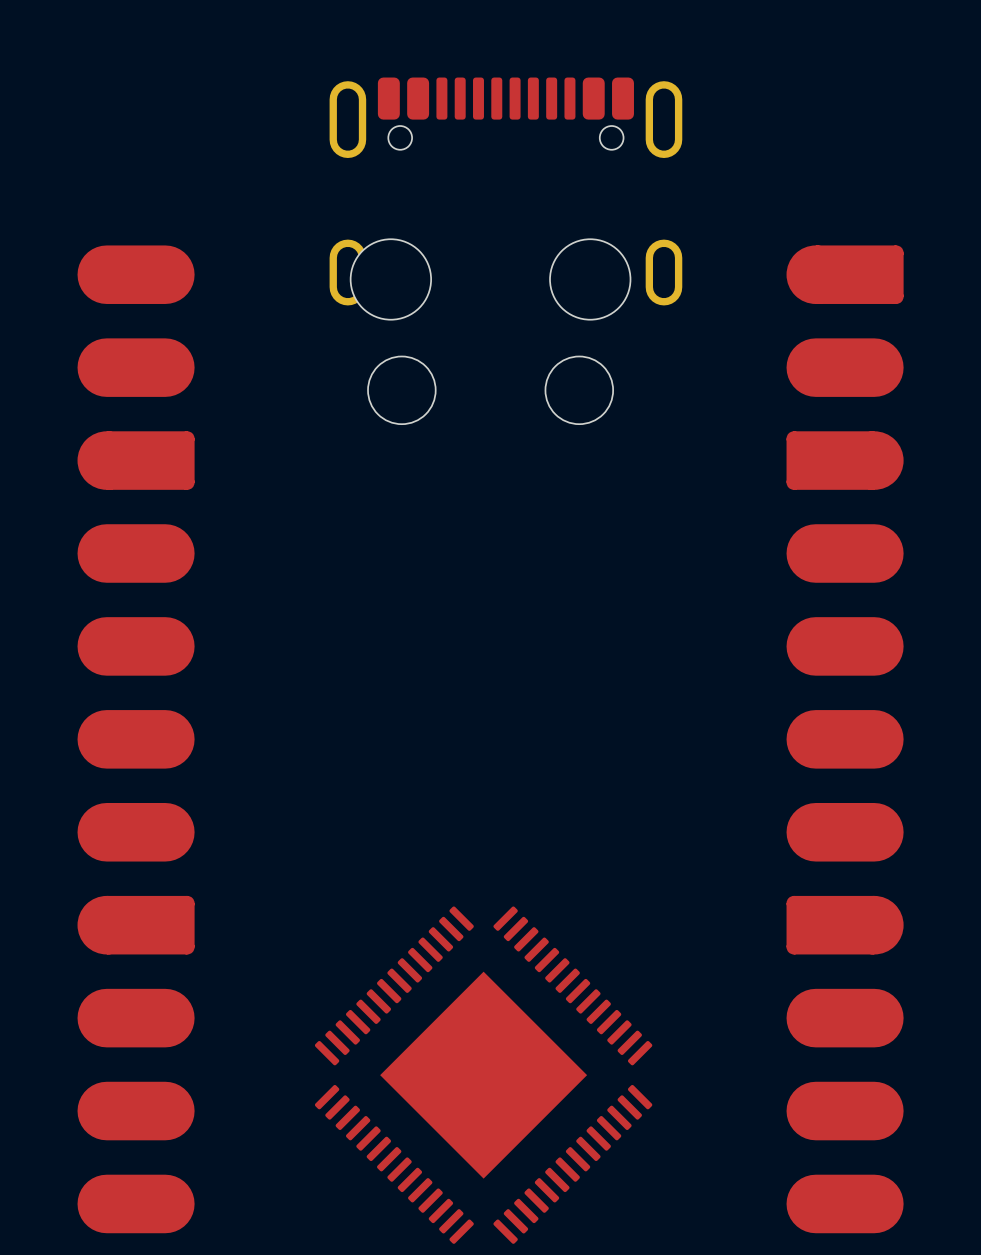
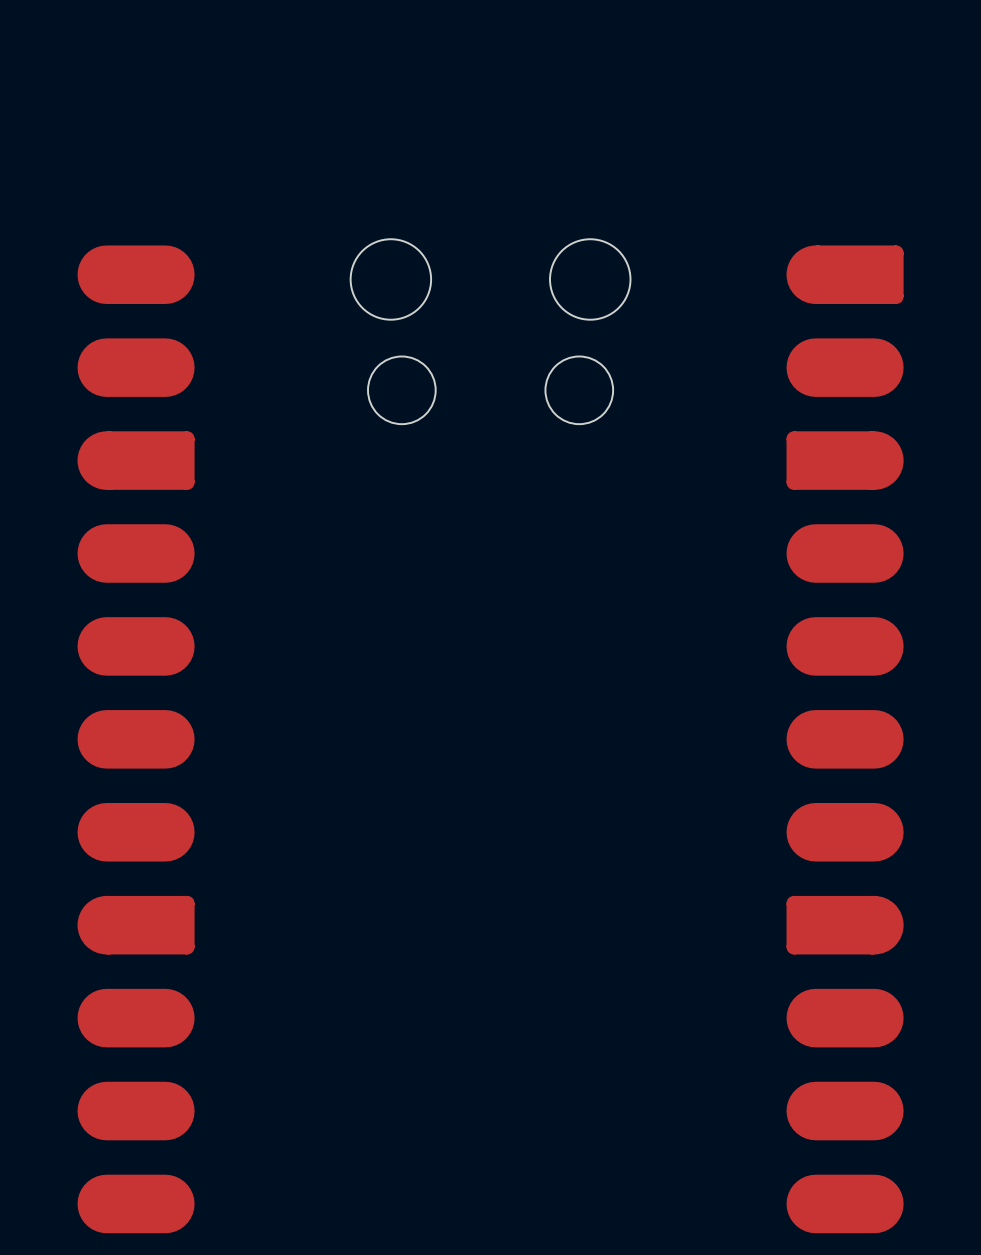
part: (505, 191) -> none
part: (483, 1075) -> none

